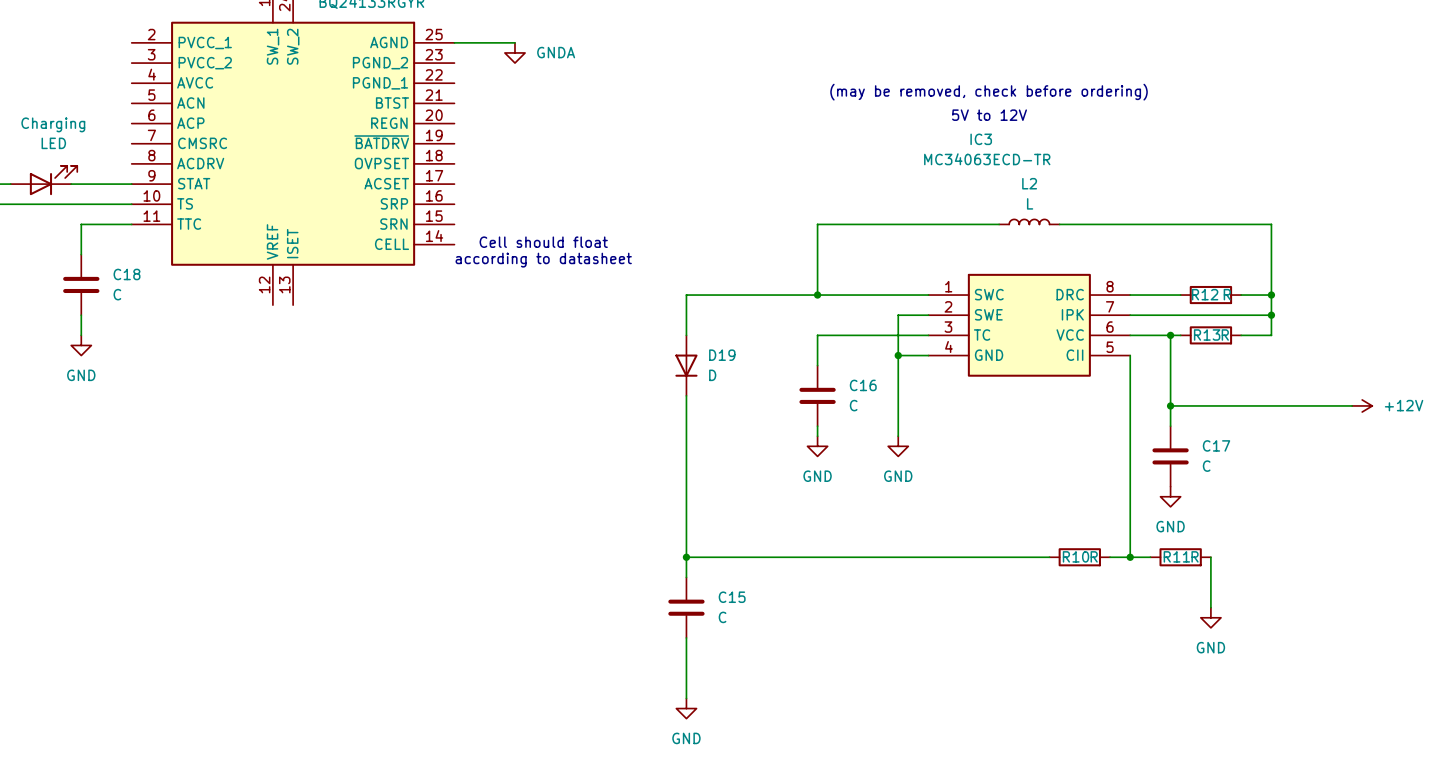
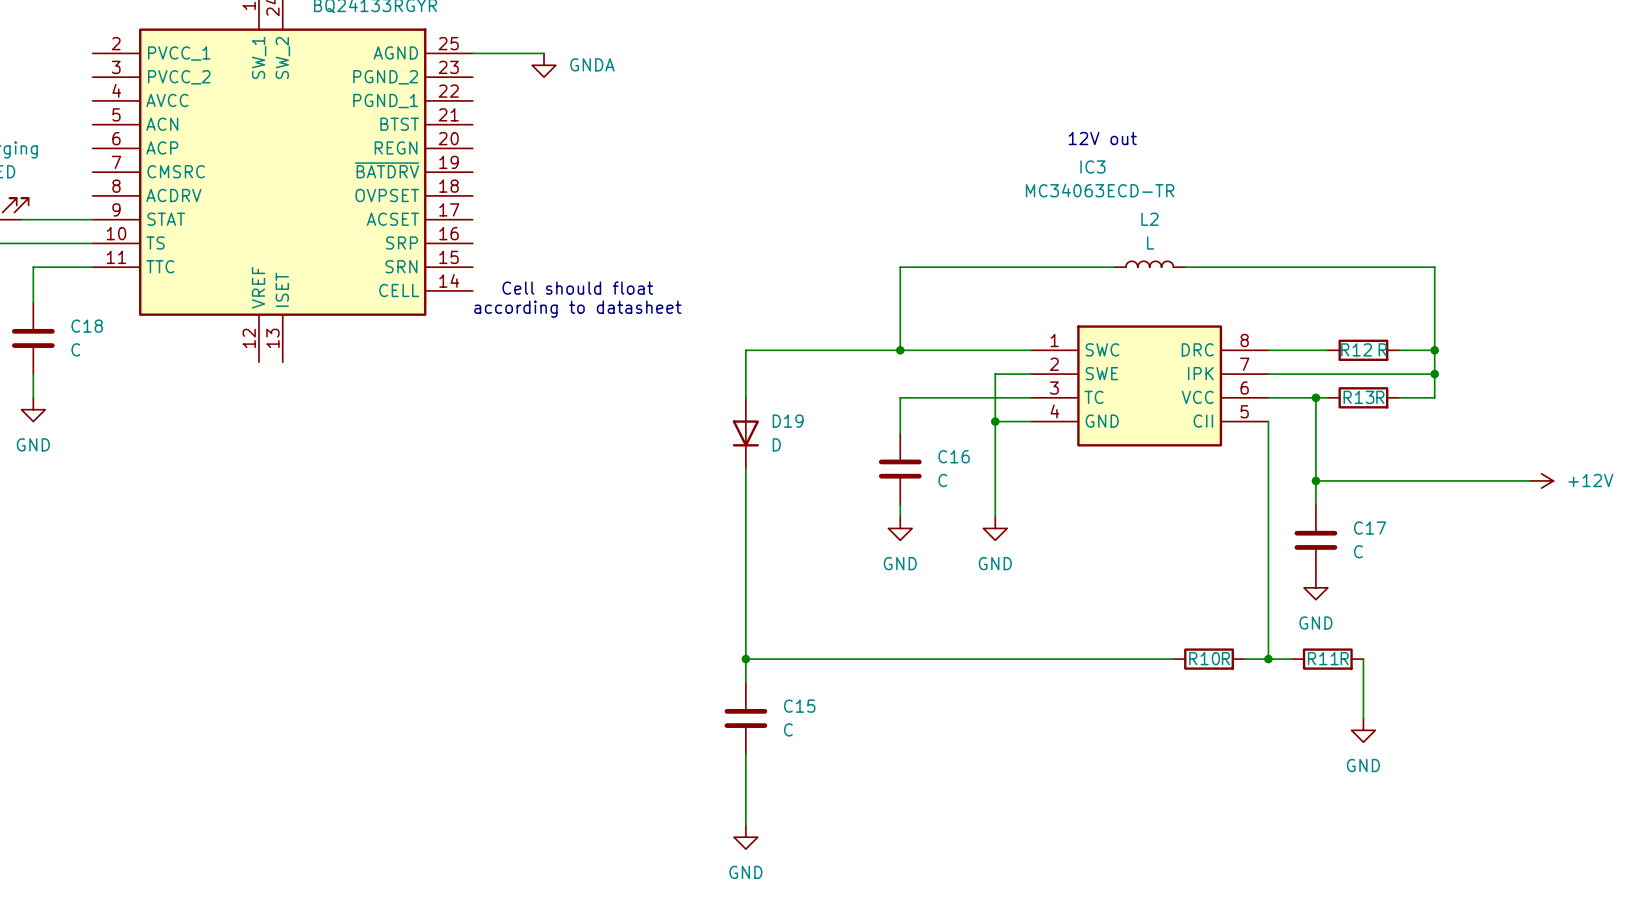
text: (may be removed, check before ordering) (989, 92) -> none
text: 5V to 12V (989, 115) -> 12V out (1102, 138)

